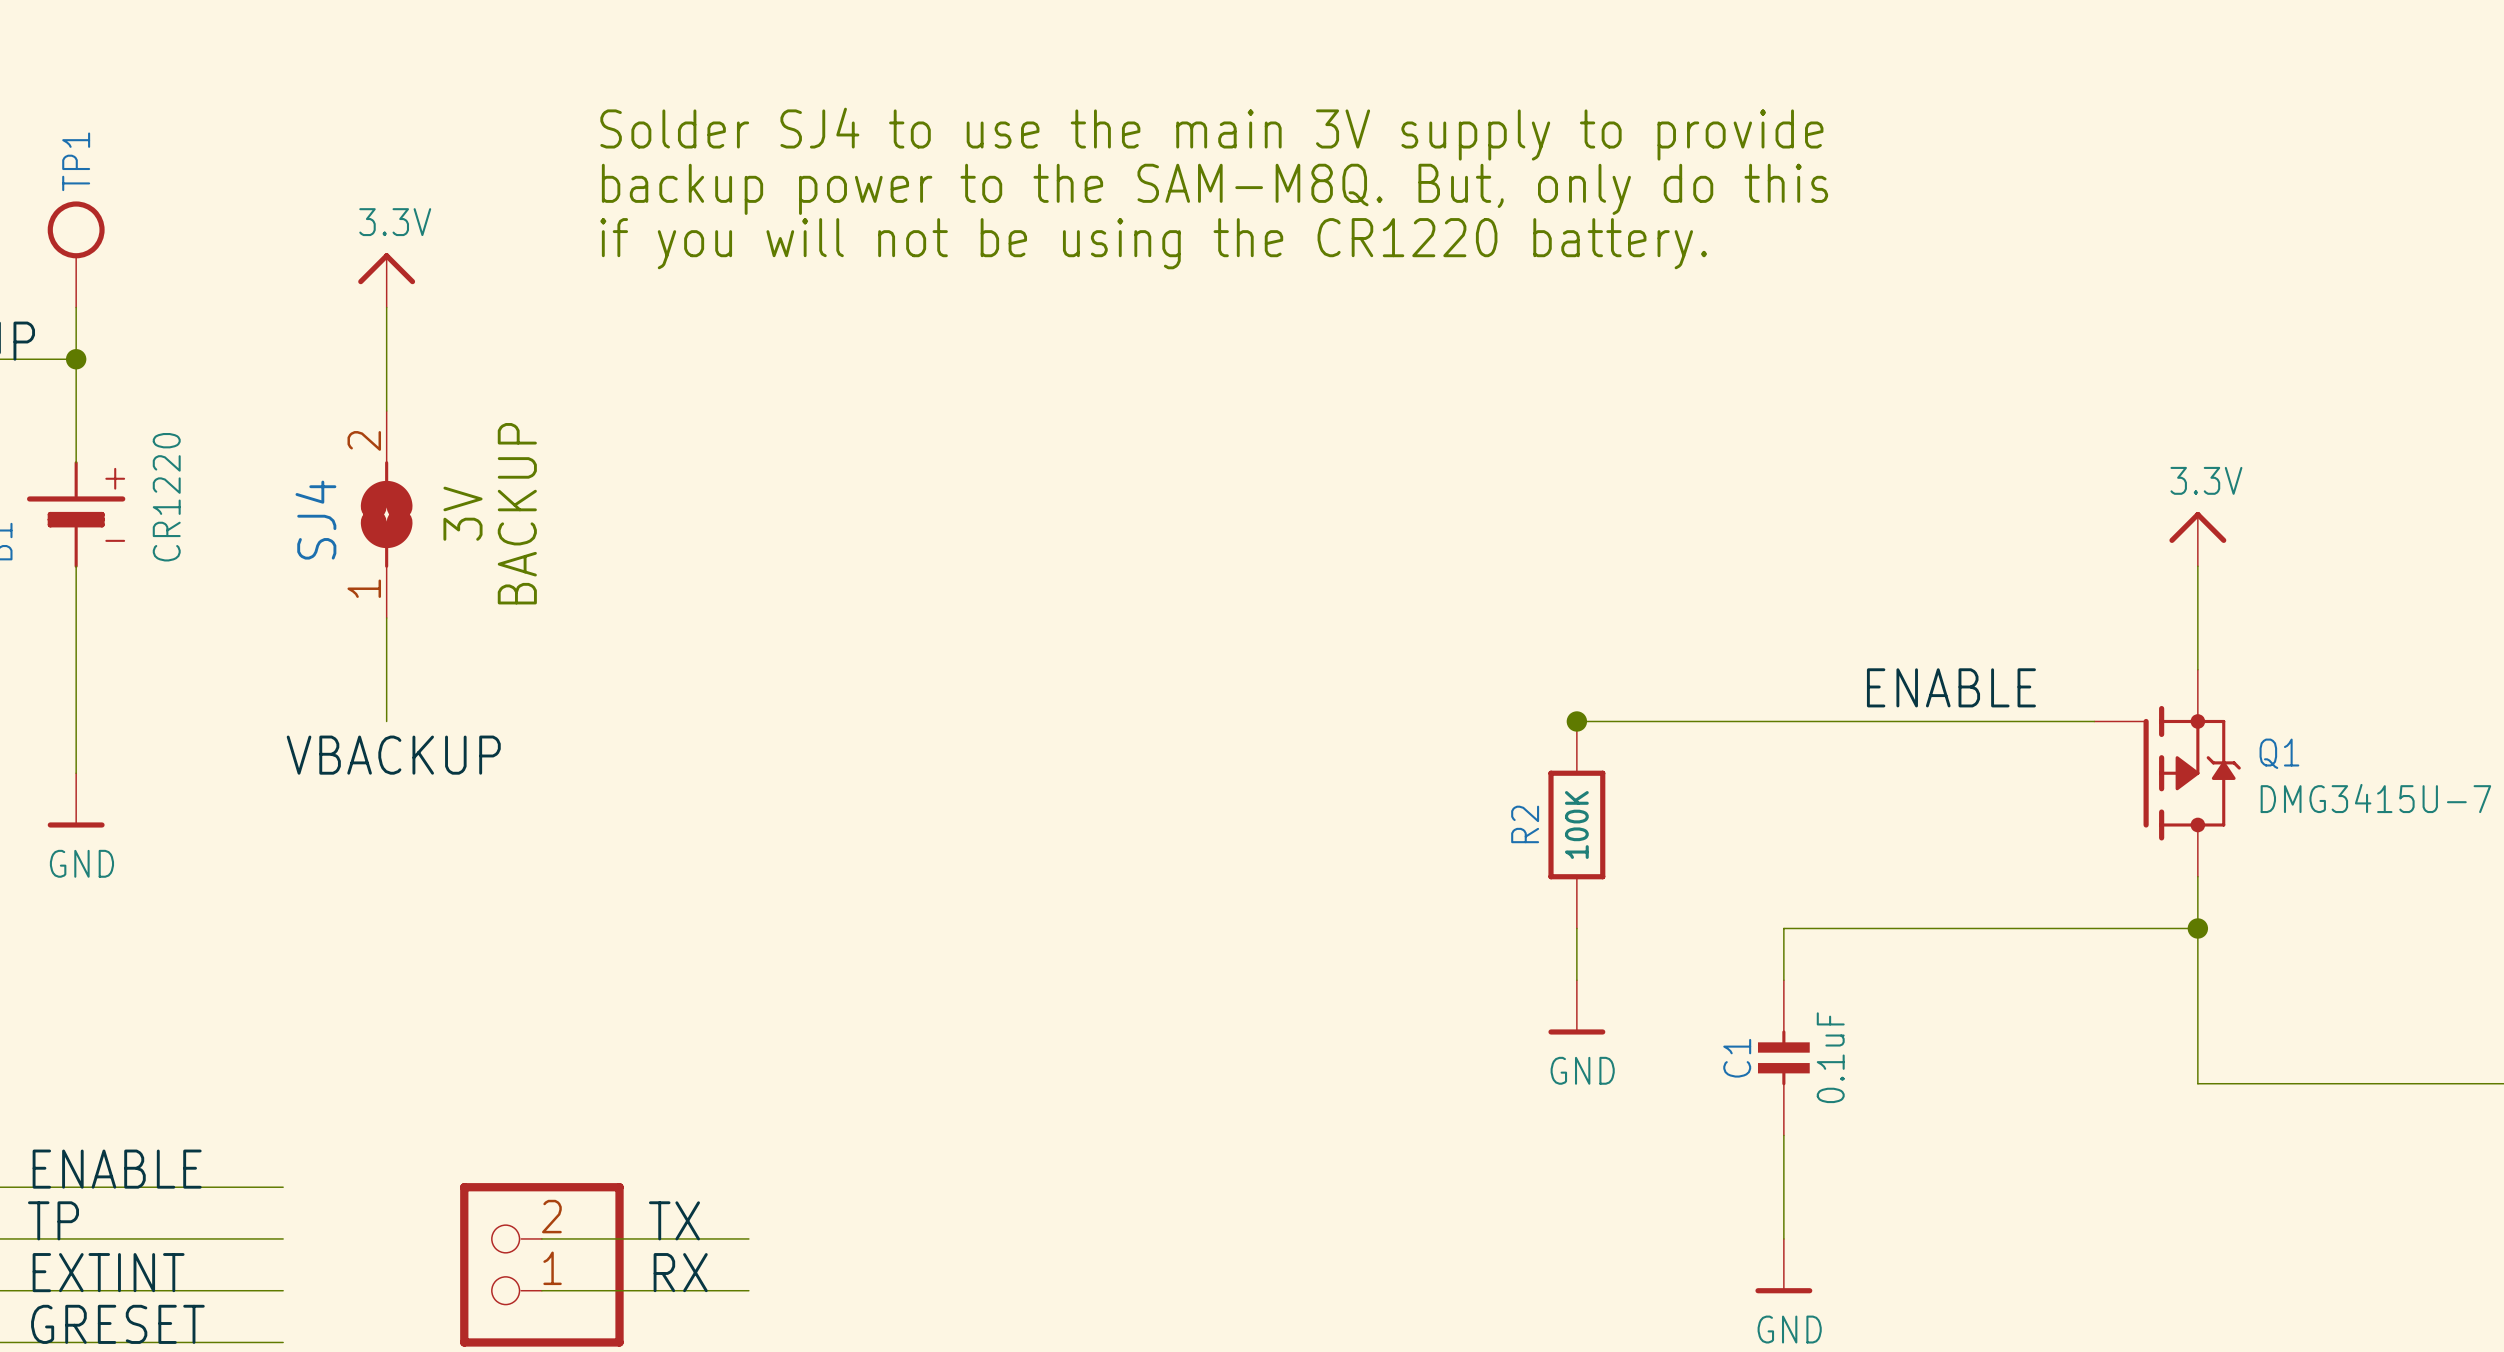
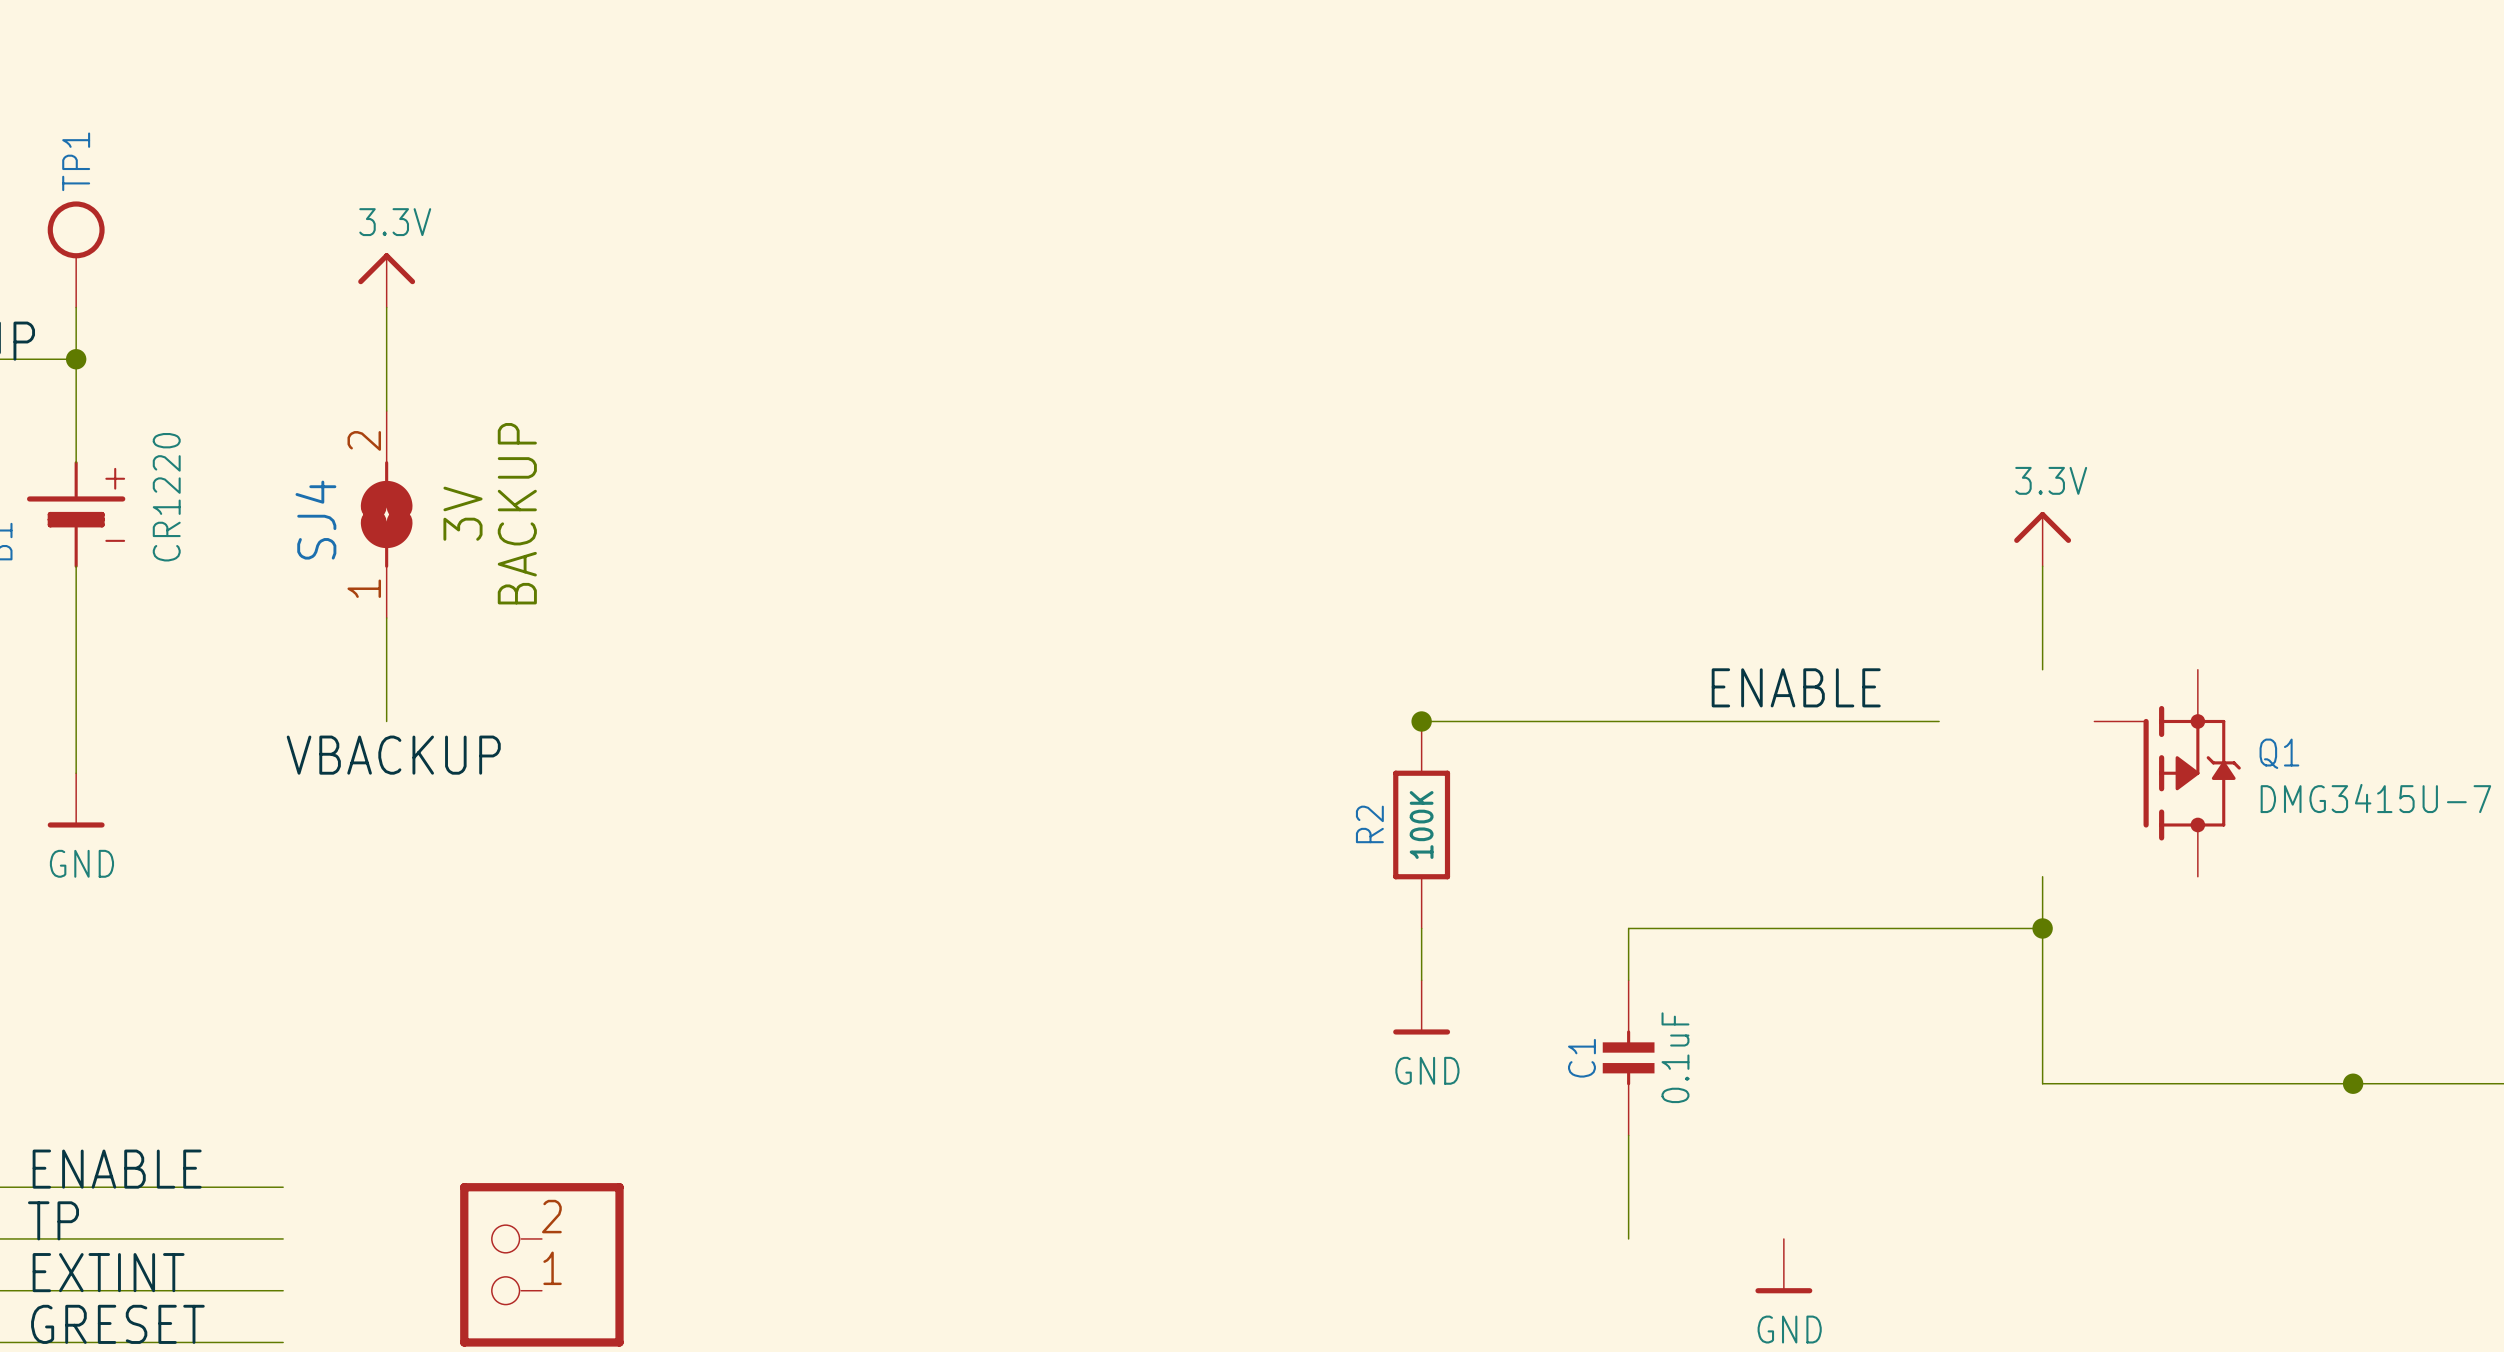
text: Solder SJ4 to use the main 3V supply to provide (1211, 134) -> none
text: backup power to the SAM-M8Q. But, only do this (1214, 189) -> none
text: if you will not be using the CR1220 battery. (1153, 243) -> none
power symbol position: 3.3V (2197, 539) -> 3.3V (2042, 539)
wire: (2197, 566) (2197, 669) -> (2042, 566) (2042, 669)
label position: ENABLE (1951, 687) -> ENABLE (1796, 687)
wire: none -> (1421, 721) (1576, 721)
junction: none -> (1421, 721)
junction: (1576, 721) -> none
wire: (1939, 721) (2094, 721) -> none
R2 position: (1576, 824) -> (1421, 824)
wire: (2197, 876) (2197, 1083) -> (2042, 876) (2042, 1083) (2197, 1083)
wire: (1576, 928) (1576, 980) -> (1421, 928) (1421, 980)
wire: (1783, 928) (1783, 980) -> (1783, 928) (1628, 928) (1628, 980)
wire: (2042, 928) (2197, 928) -> none
junction: none -> (2042, 928)
junction: (2197, 928) -> none
power symbol position: GND (1576, 1007) -> GND (1421, 1007)
C1 position: (1783, 1057) -> (1628, 1057)
junction: none -> (2353, 1083)
wire: (1783, 1135) (1783, 1238) -> (1628, 1135) (1628, 1238)
label: TX (674, 1220) -> none
wire: (541, 1238) (748, 1238) -> none
label: RX (680, 1272) -> none
wire: (541, 1290) (748, 1290) -> none

